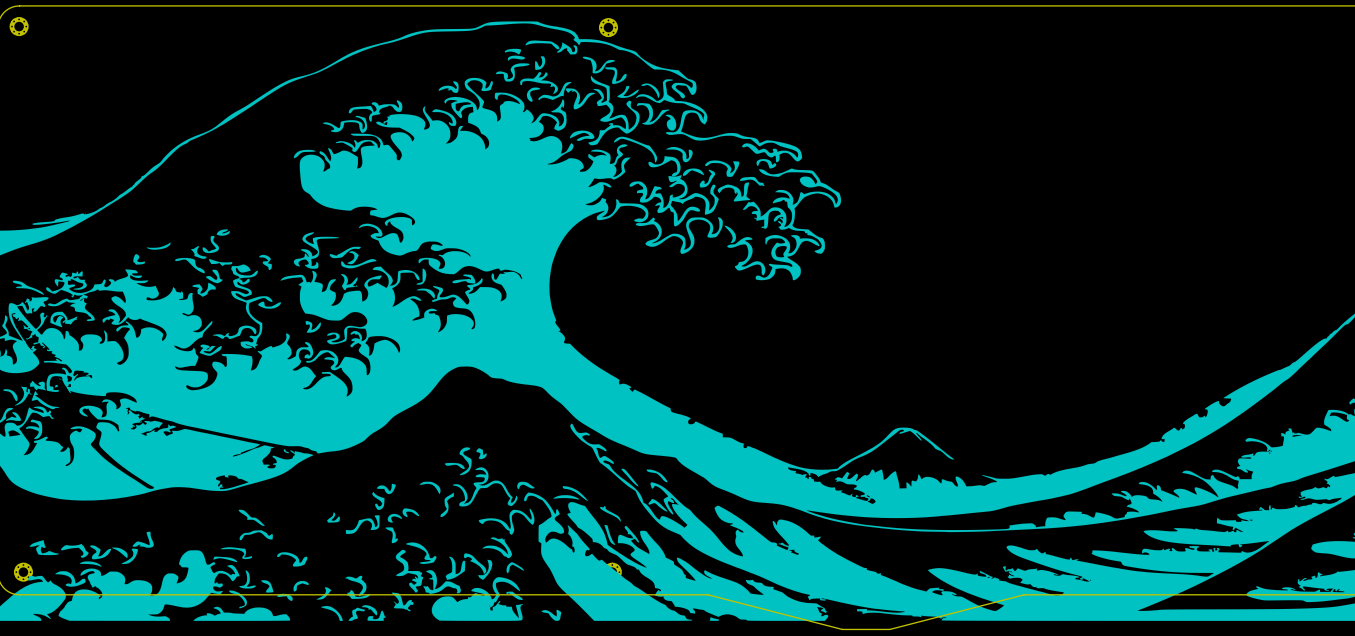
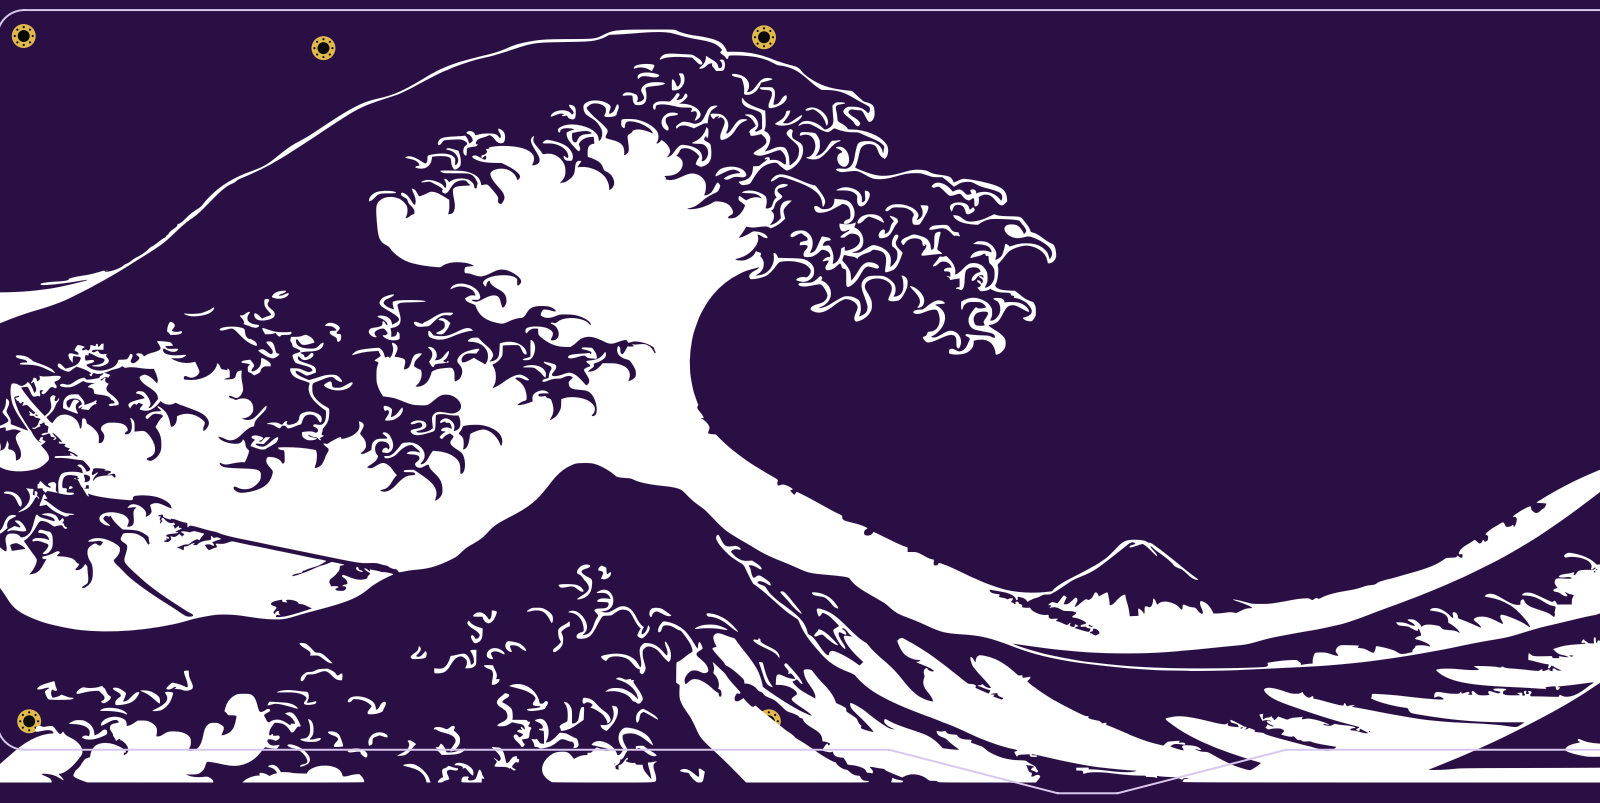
part: none -> (323, 48)

